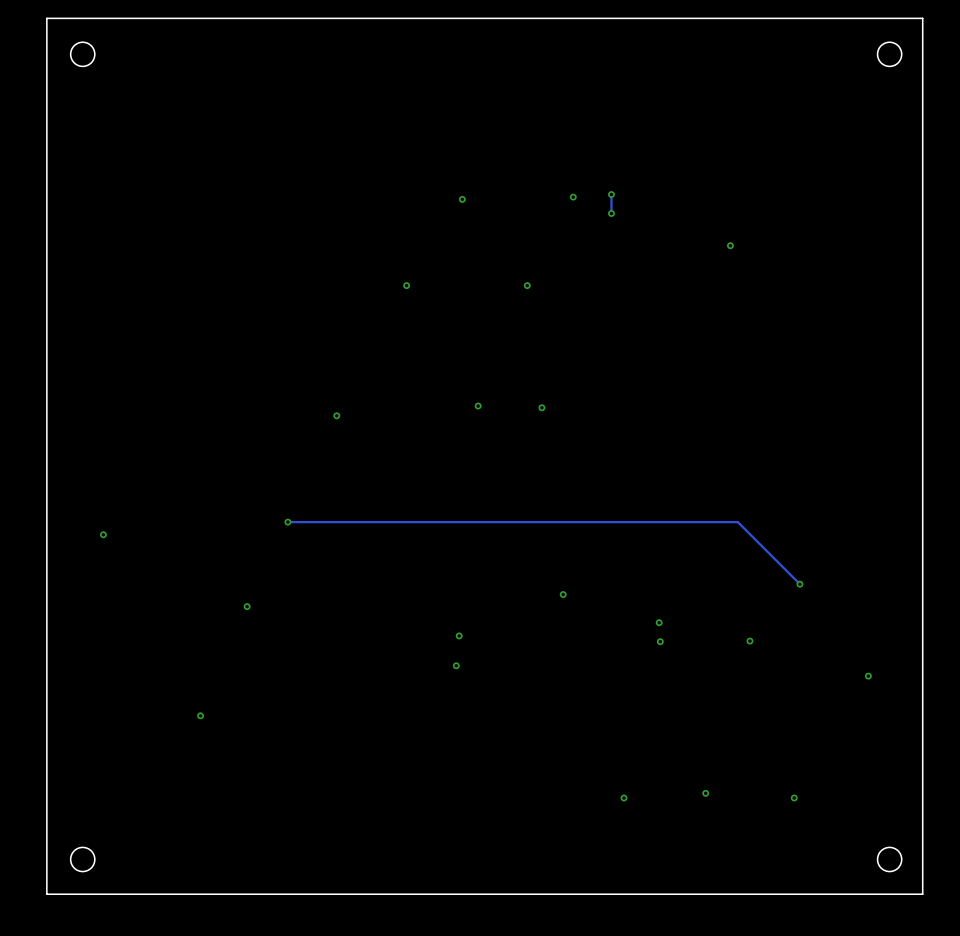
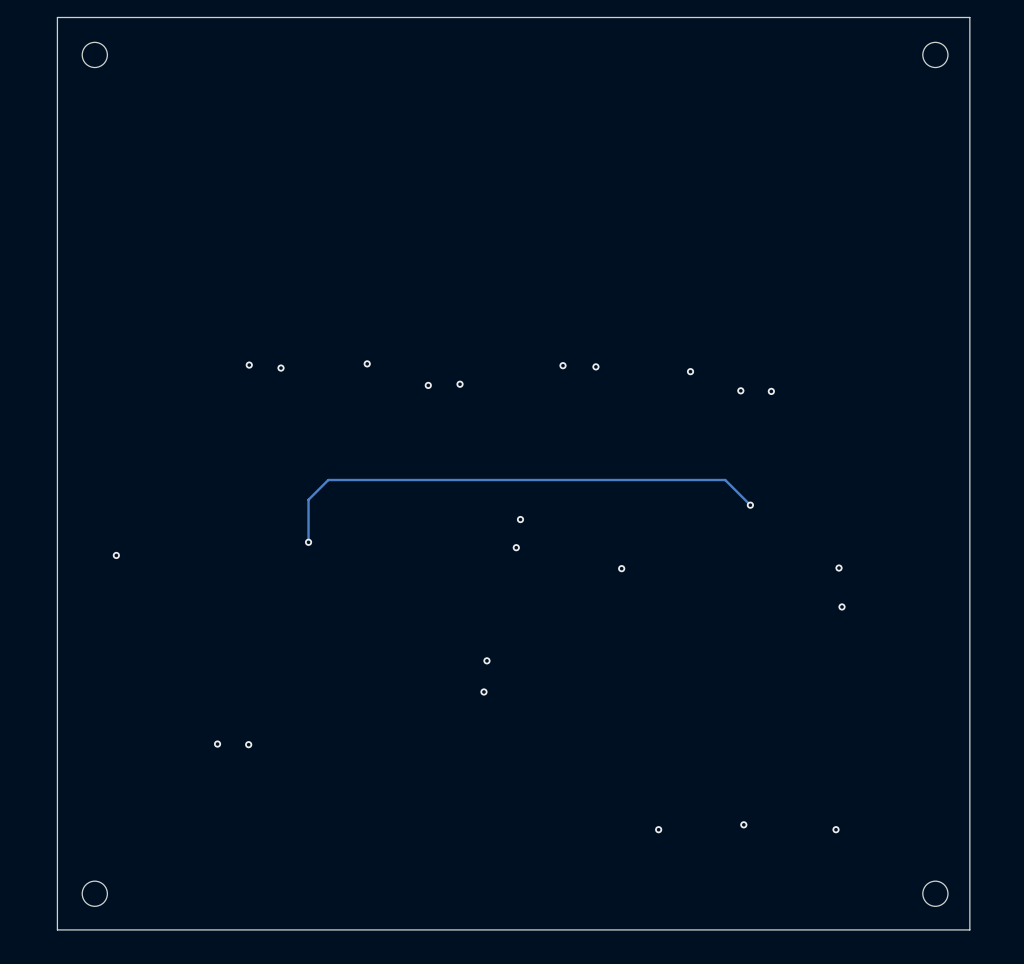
track: (611, 194) (611, 213) -> none
via: (611, 194) -> none
via: (573, 197) -> none
via: (462, 199) -> none
via: (611, 213) -> none
via: (730, 245) -> none
via: (406, 285) -> none
via: (527, 285) -> none
via: none -> (367, 363)
via: none -> (249, 365)
via: none -> (563, 365)
via: none -> (595, 366)
via: none -> (281, 368)
via: none -> (690, 371)
via: none -> (460, 384)
via: none -> (428, 385)
via: none -> (740, 390)
via: none -> (771, 391)
via: (478, 406) -> none
via: (541, 407) -> none
via: (336, 415) -> none
via: none -> (750, 505)
via: none -> (520, 519)
track: (287, 522) (737, 522) (799, 584) -> (308, 542) (308, 499) (328, 480) (725, 480) (750, 505)
via: none -> (516, 547)
via: none -> (839, 568)
via: none -> (621, 568)
via: (563, 594) -> none
via: (247, 606) -> none
via: (659, 622) -> none
via: (660, 641) -> none
via: (749, 641) -> none
via: (868, 676) -> none
via: none -> (248, 744)

